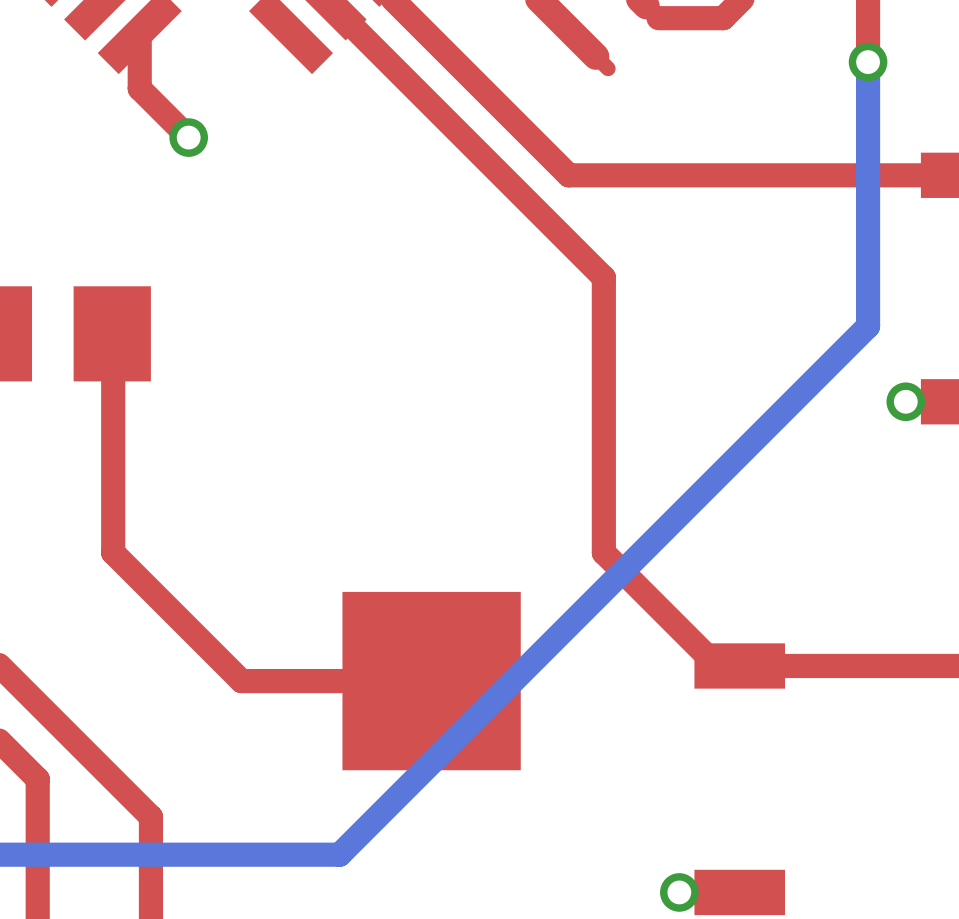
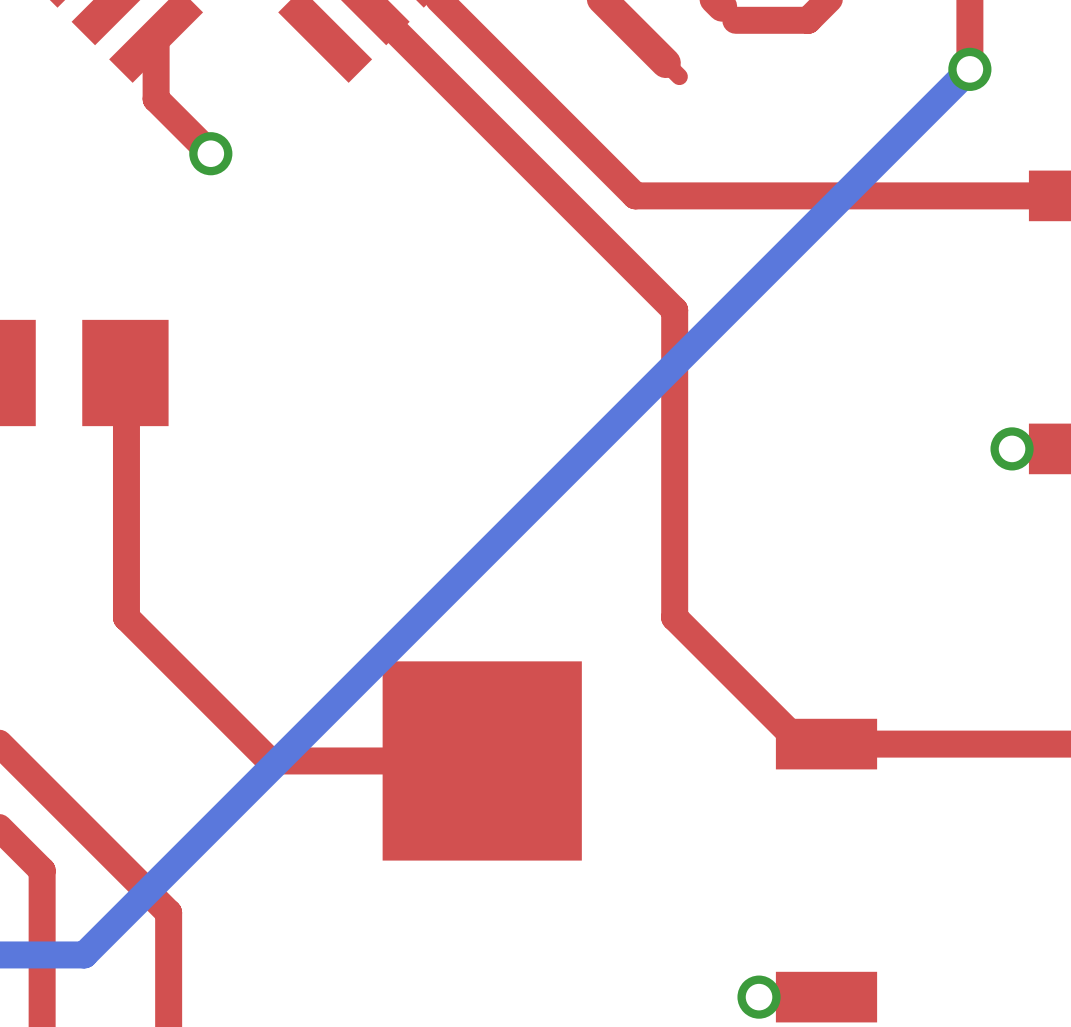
bottom track: (868, 62) (868, 326) (339, 854) (75, 854) -> (969, 69) (84, 954)

